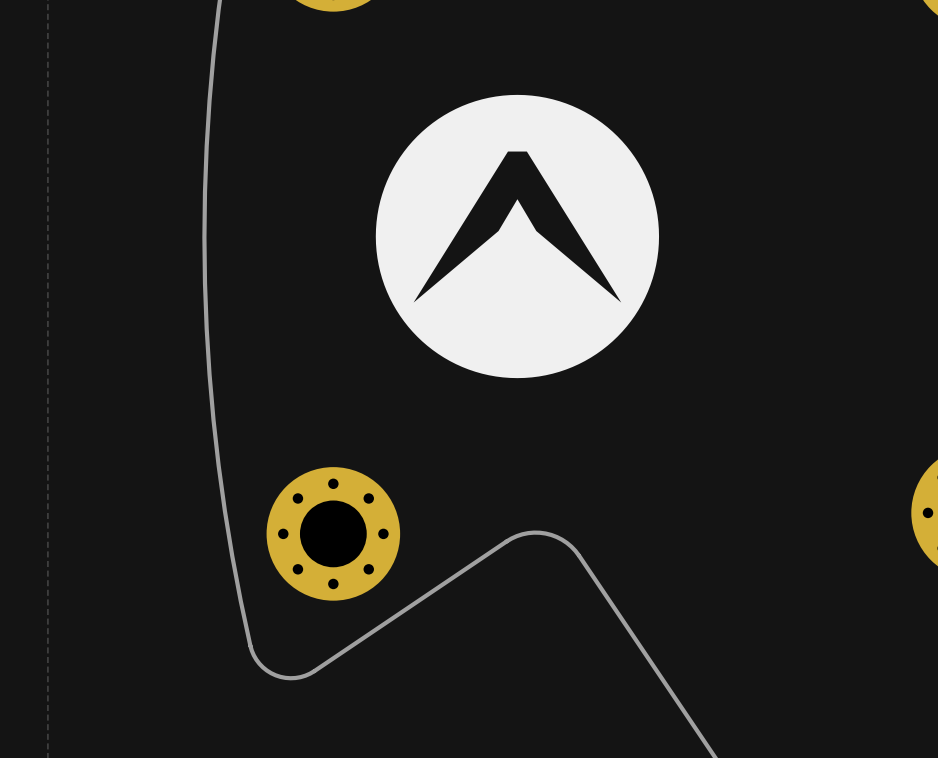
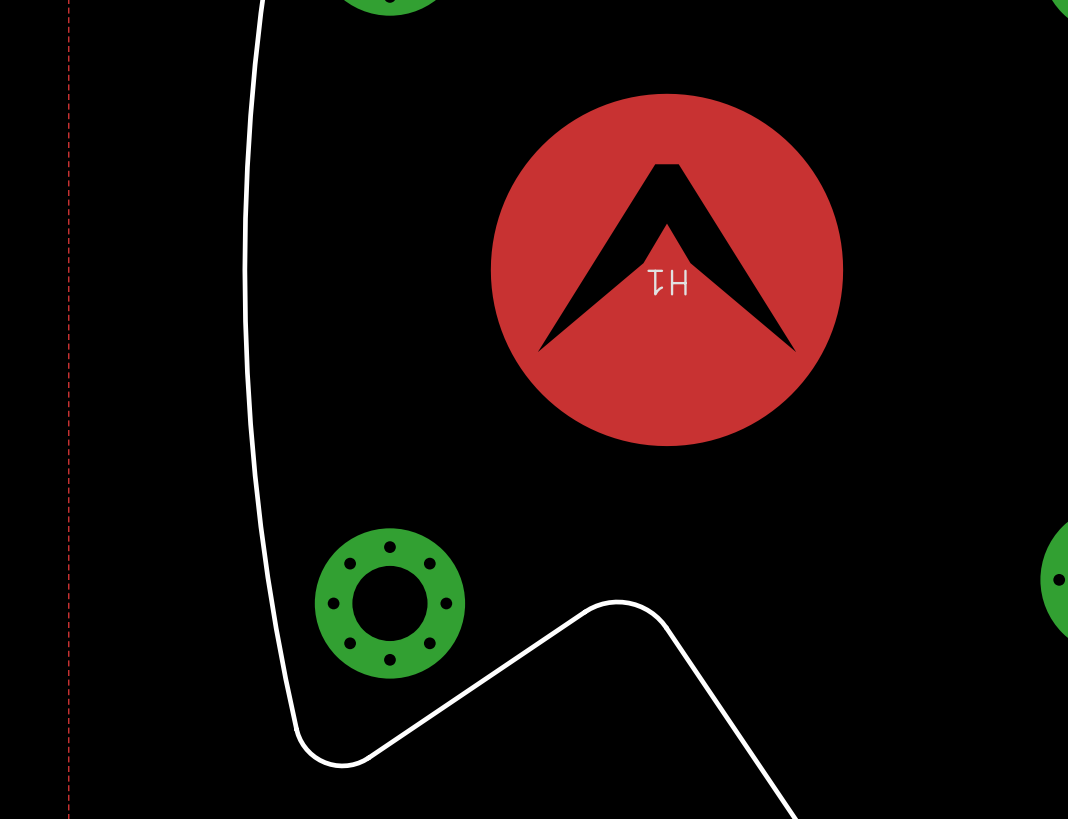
drawing: [375, 94, 660, 379] -> none
H1: none -> (666, 269)

